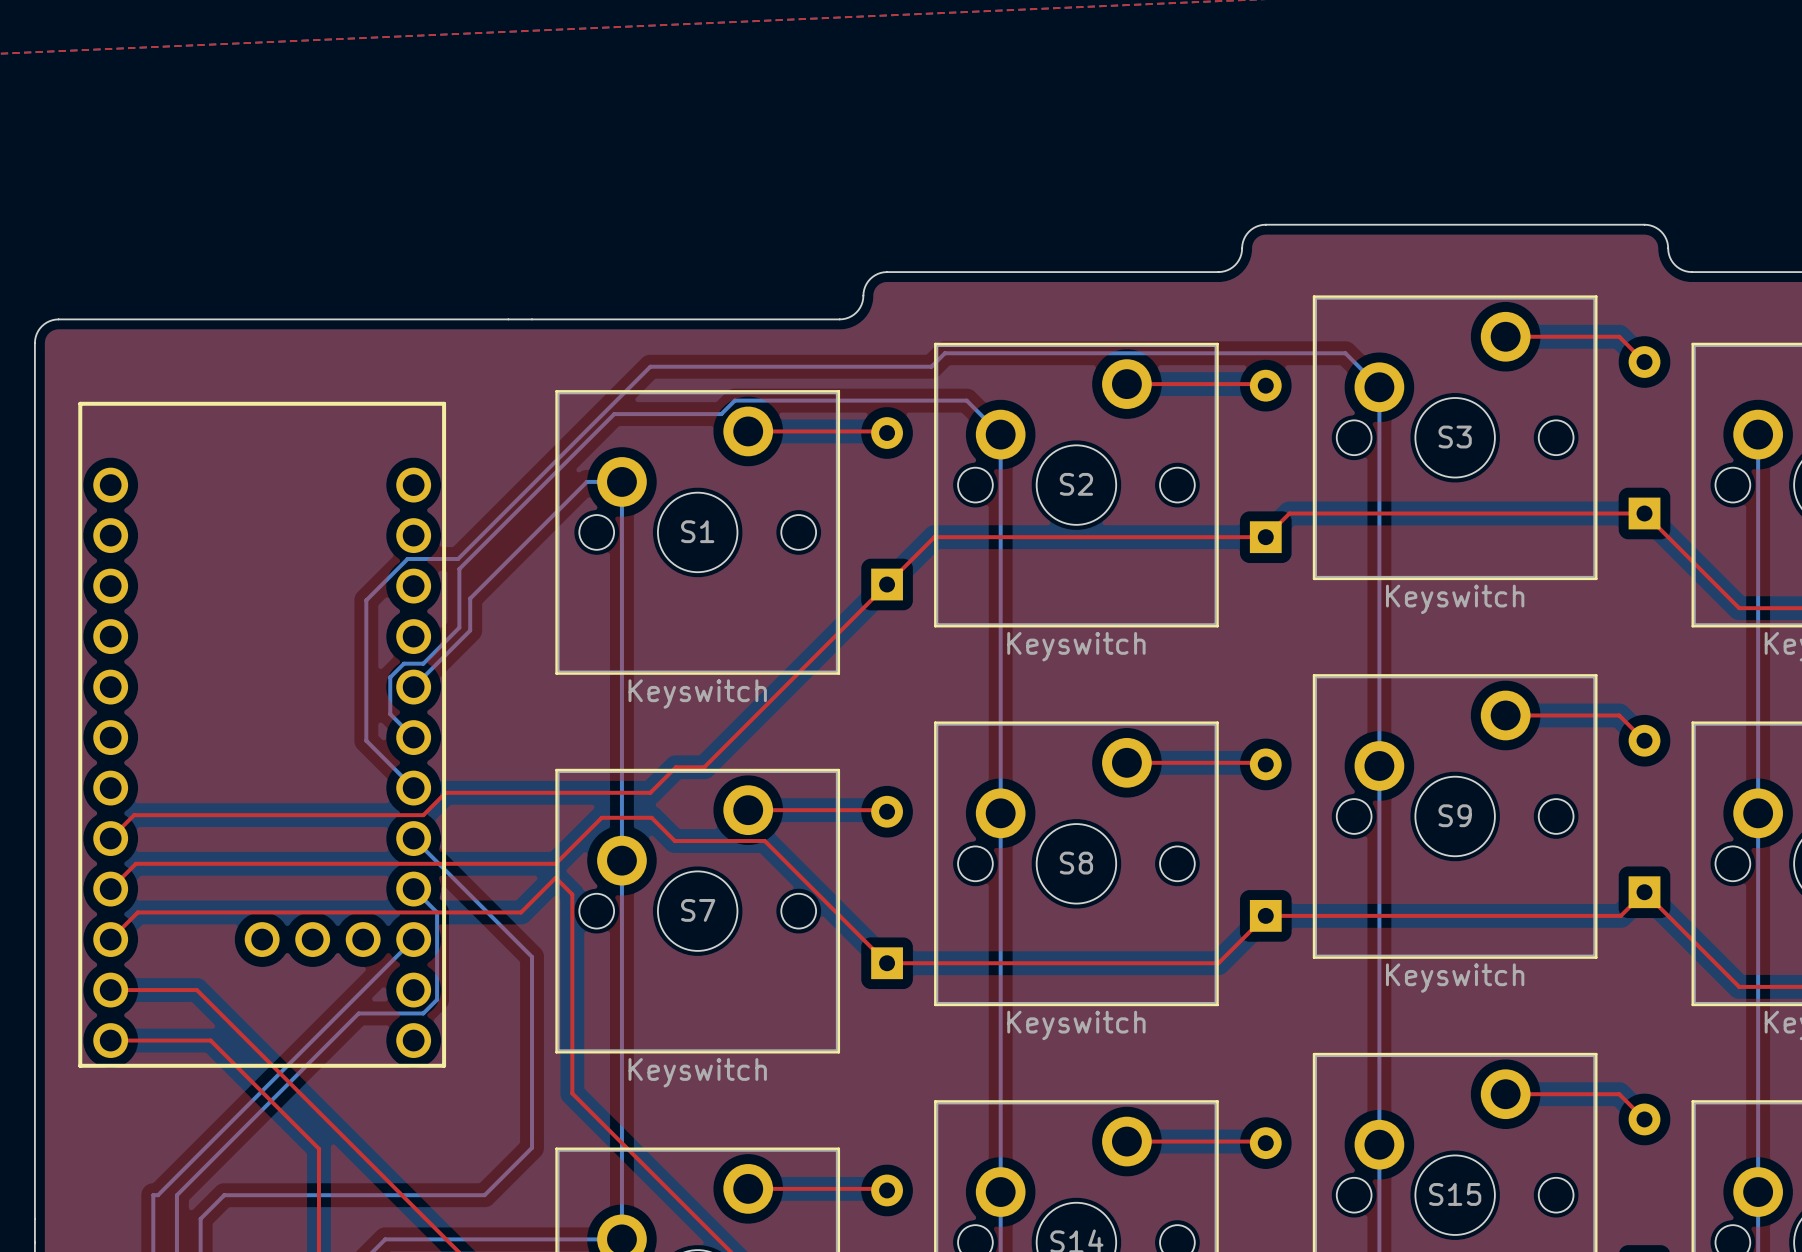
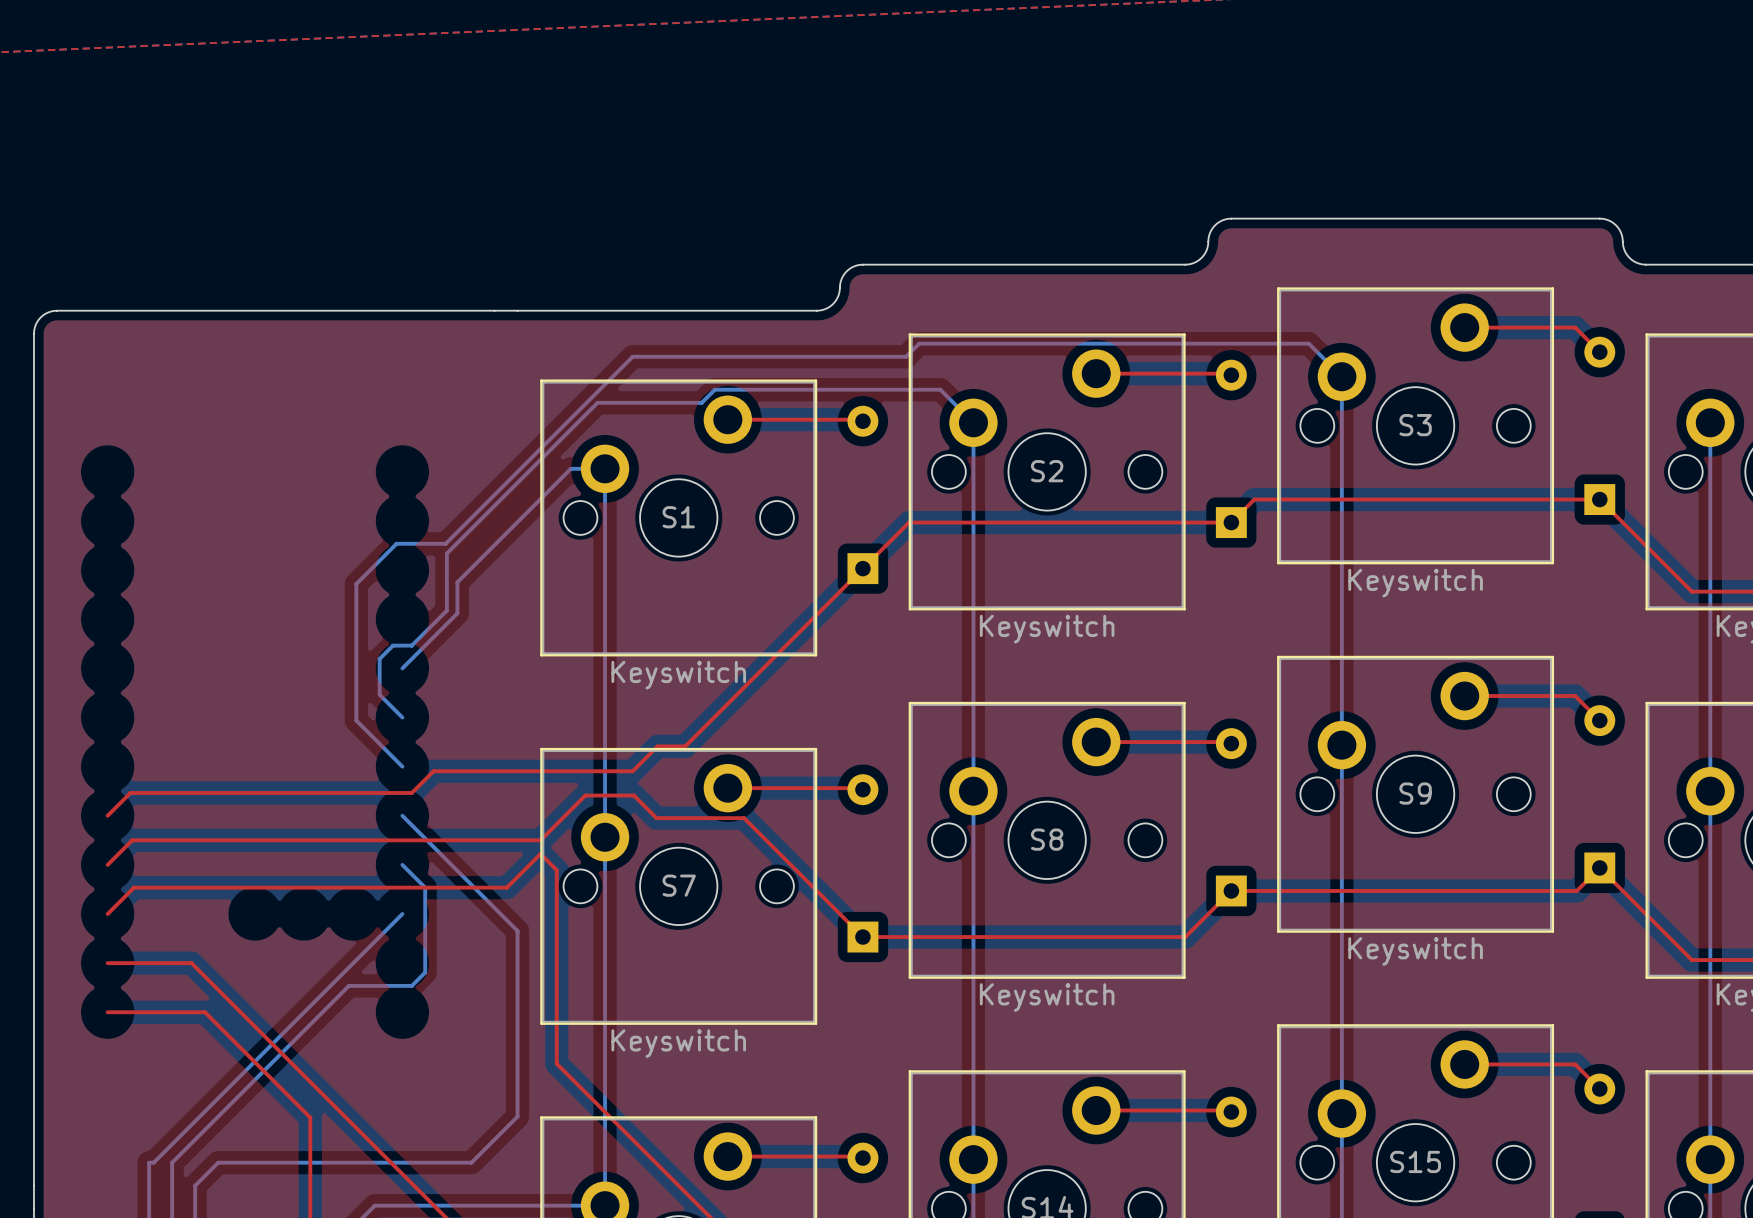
part: (262, 734) -> none

